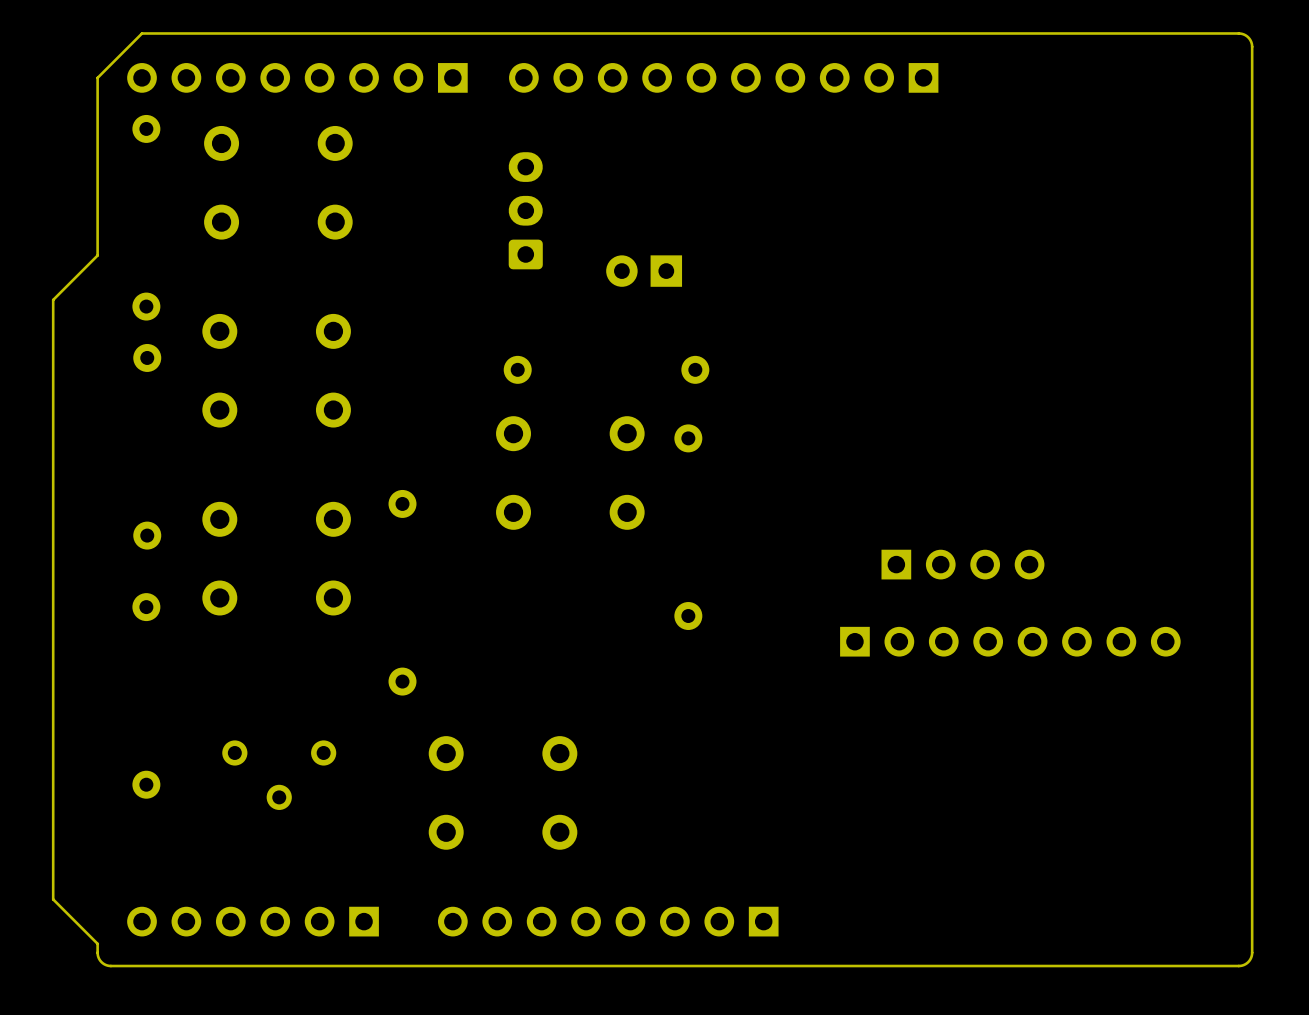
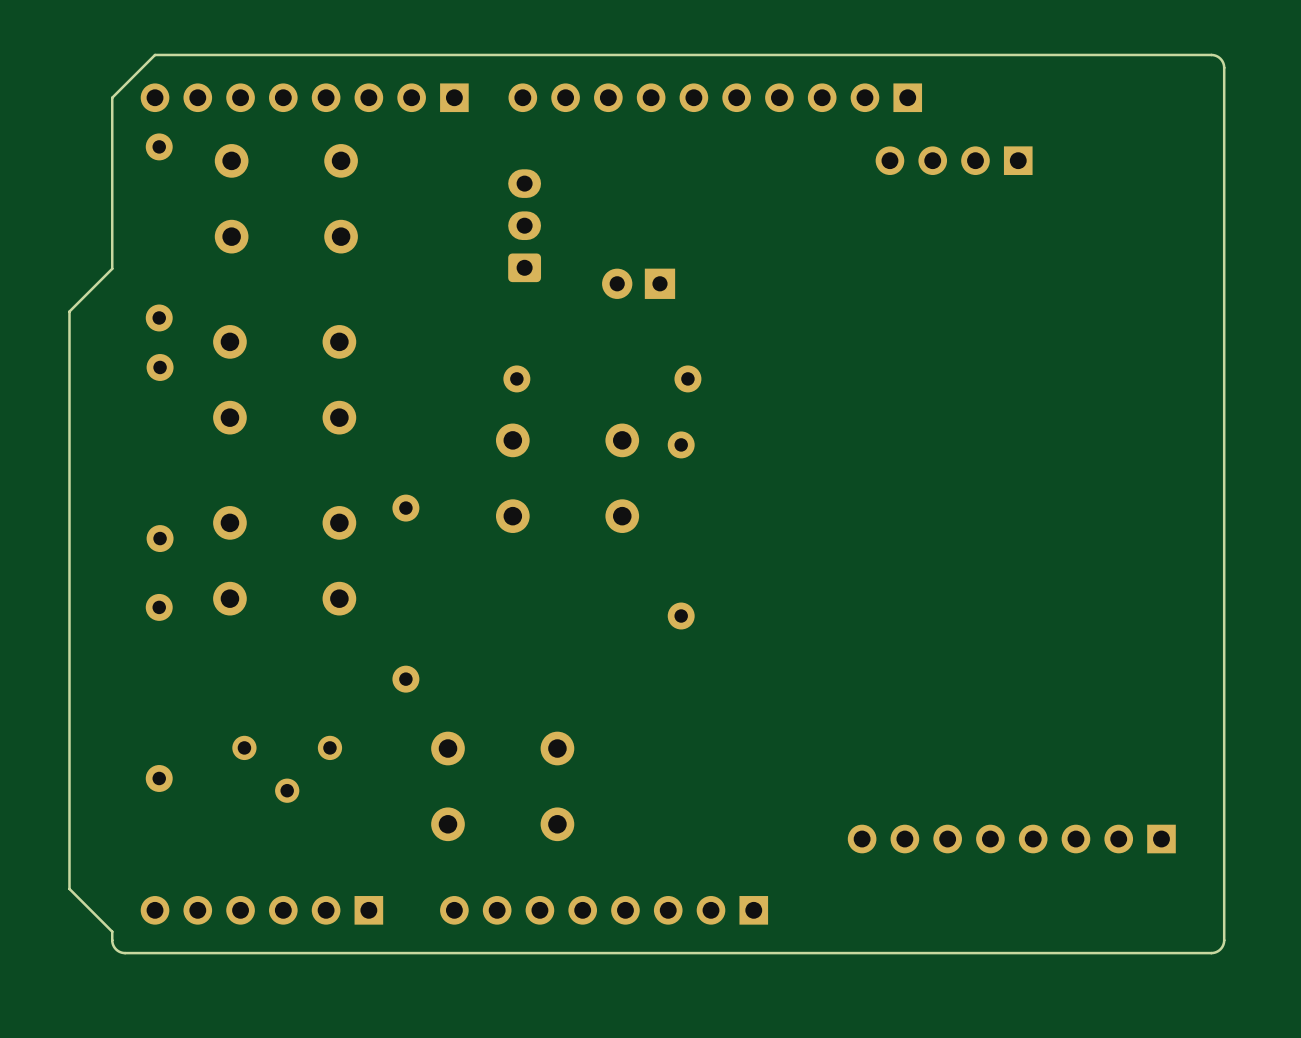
part rotation: 0° (962, 564) -> 180° (954, 160)
part position: (962, 564) -> (954, 160)
part rotation: 0° (1010, 641) -> 180° (1011, 839)
part position: (1010, 641) -> (1011, 839)

